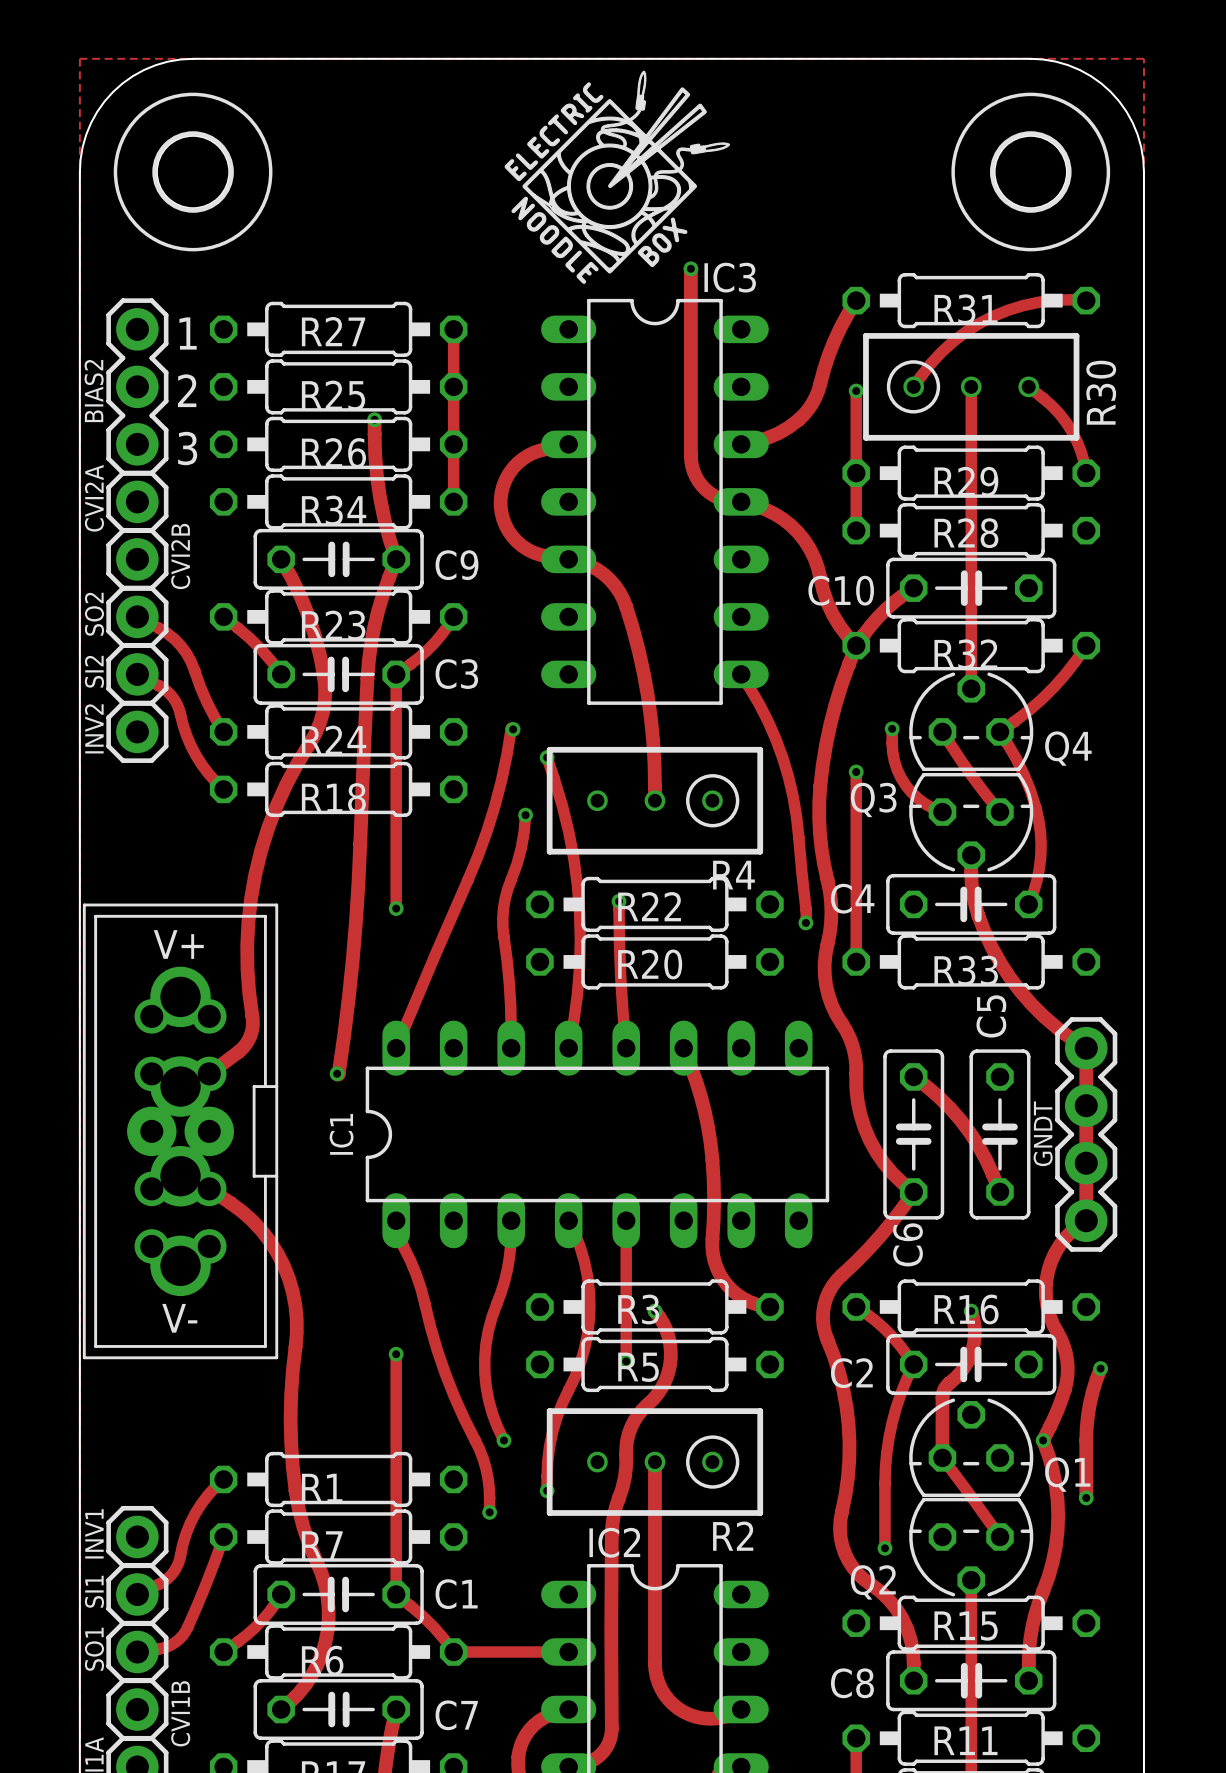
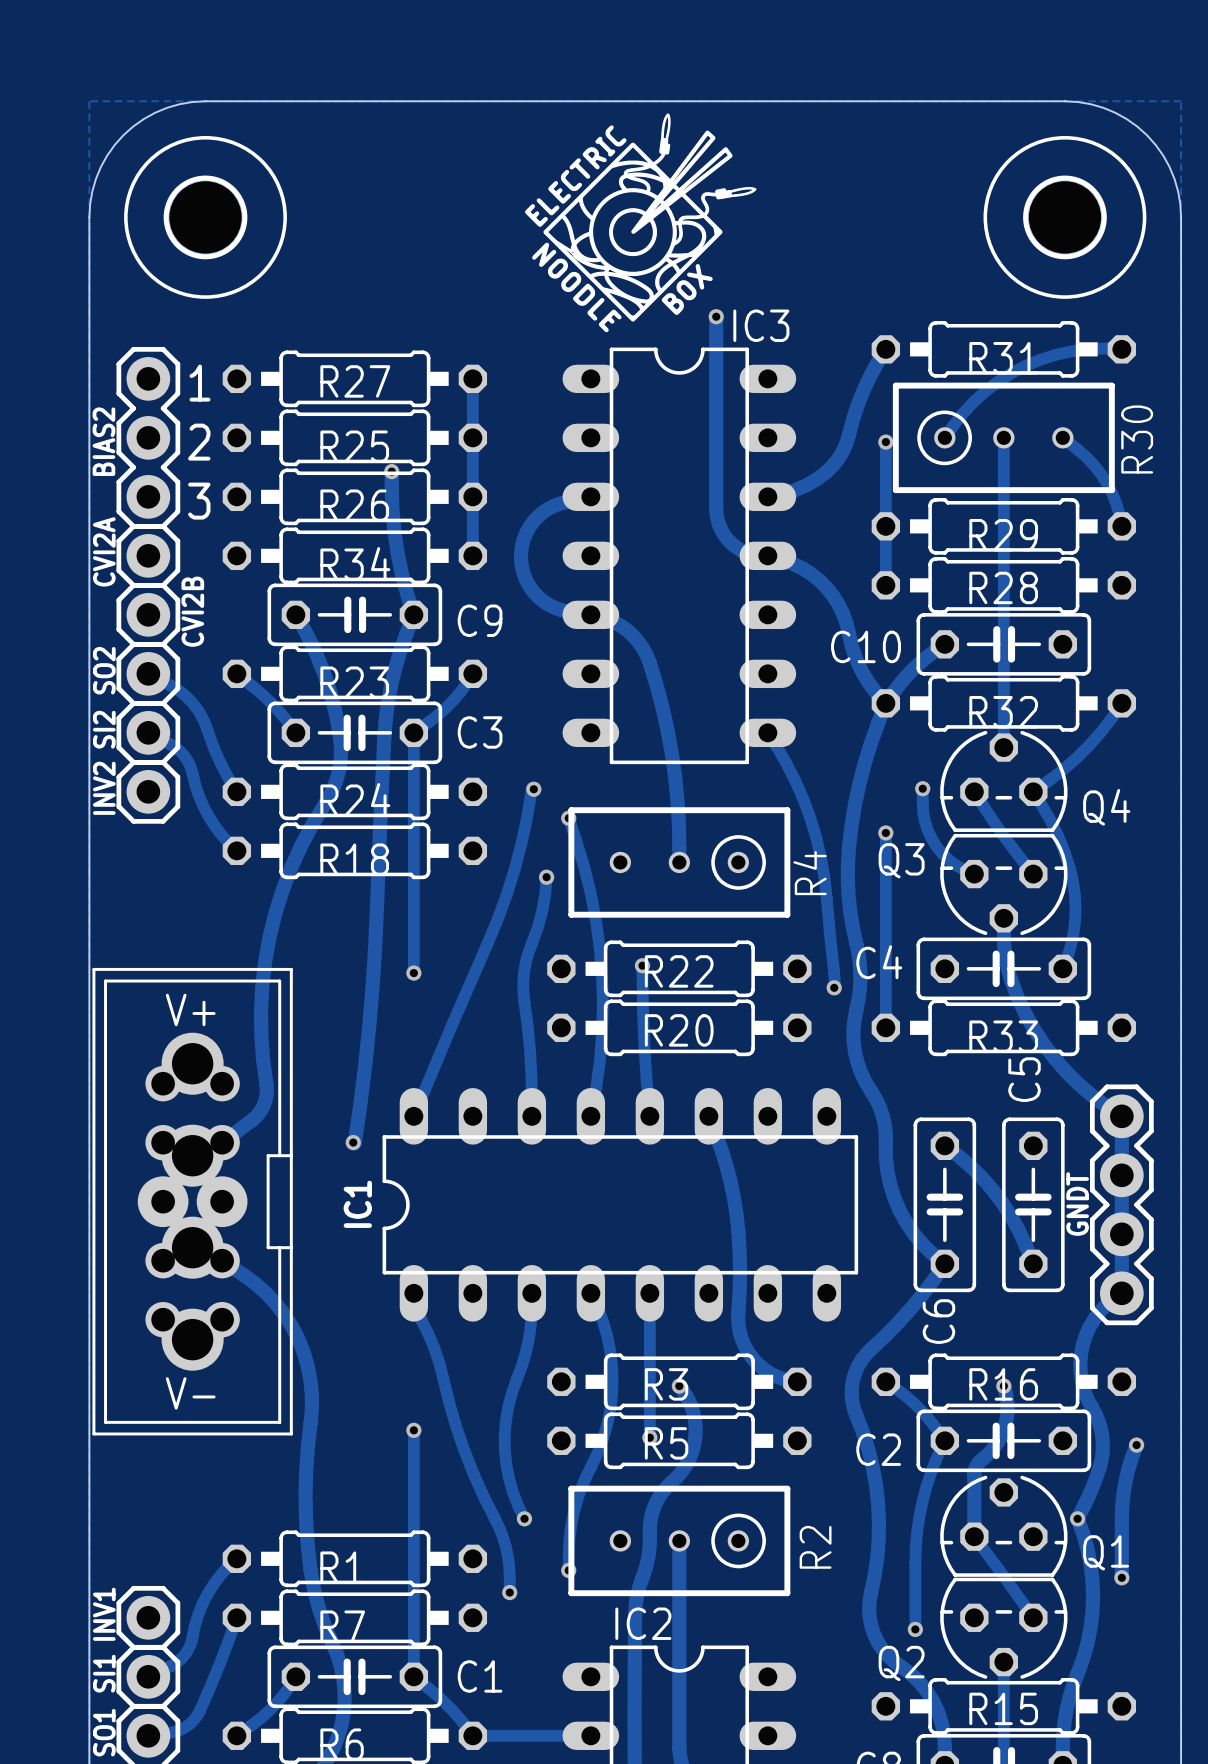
R4 name rotation: 0° (733, 875) -> 90° counterclockwise (810, 873)
R4 name position: R4 (733, 875) -> R4 (810, 873)
R2 name rotation: 0° (733, 1536) -> 90° counterclockwise (815, 1547)
R2 name position: R2 (733, 1536) -> R2 (815, 1547)

